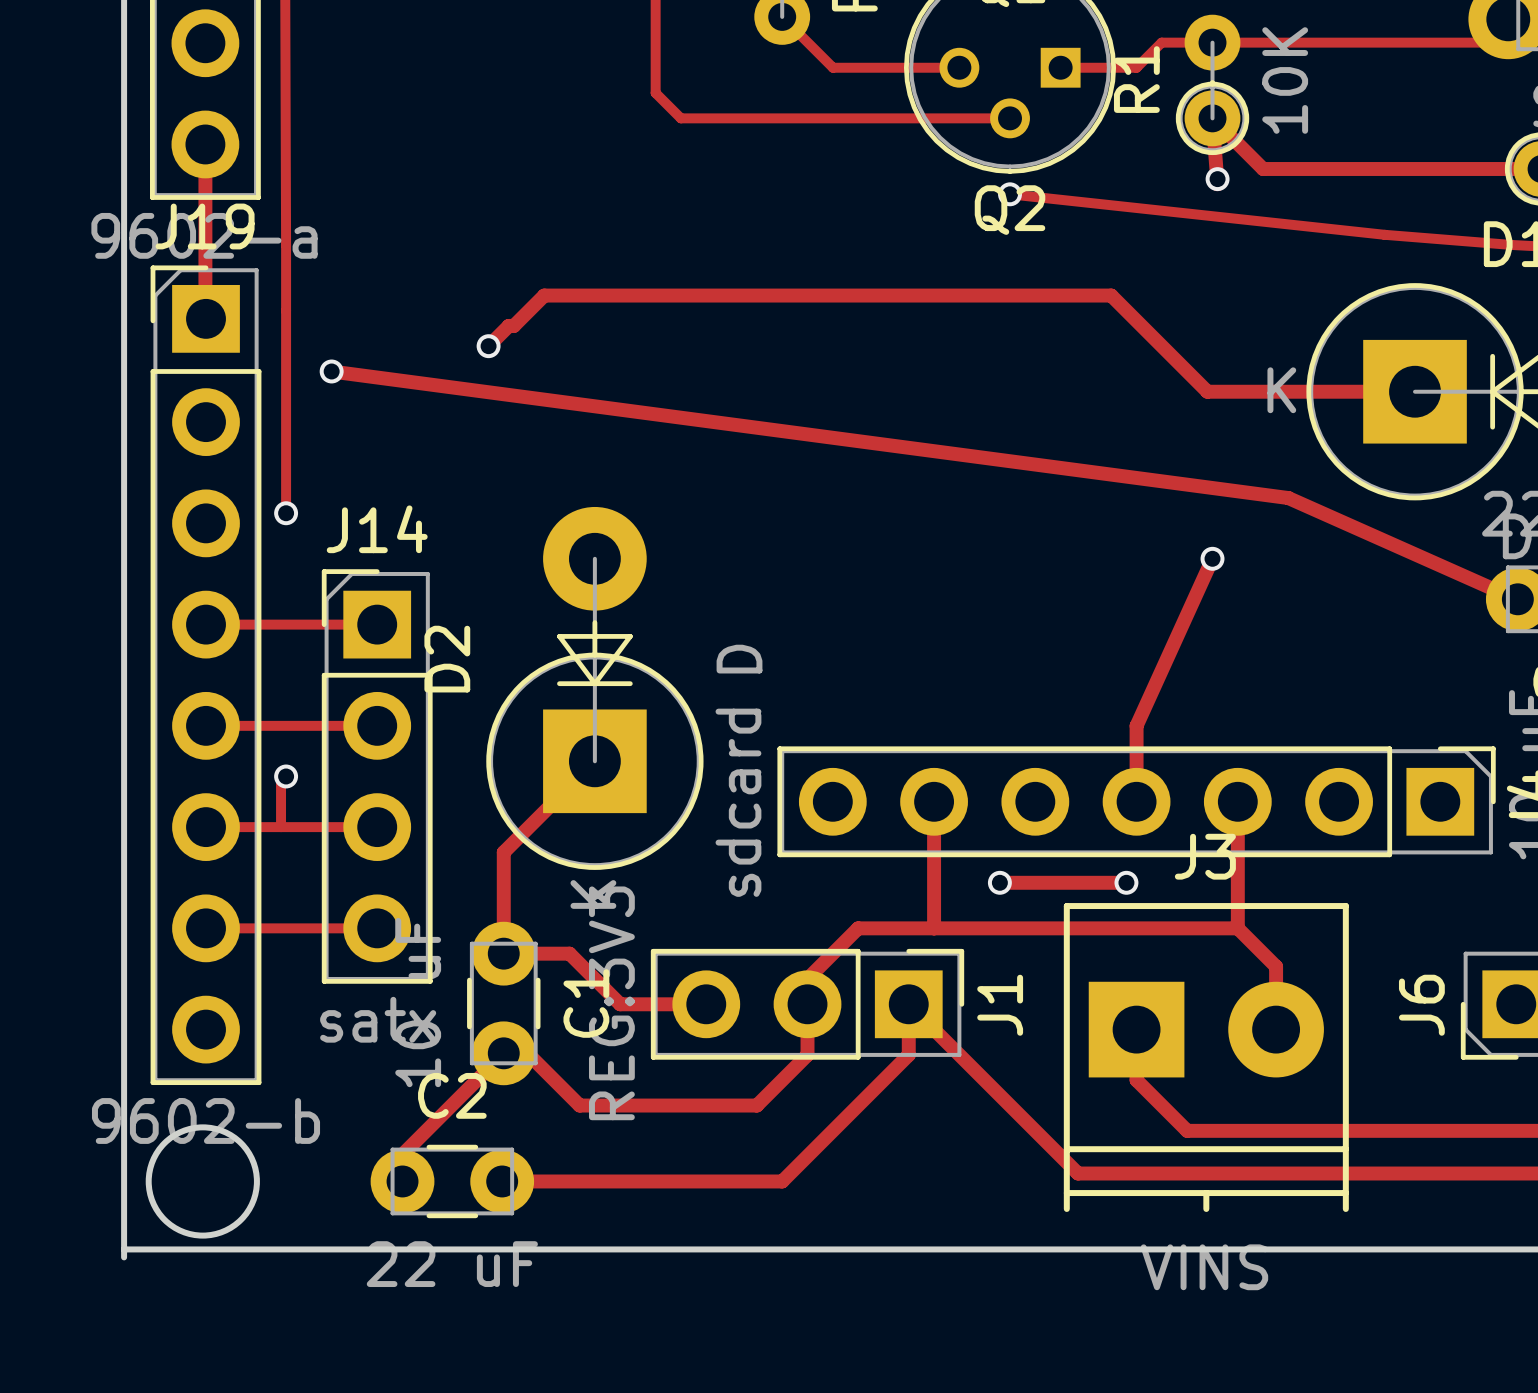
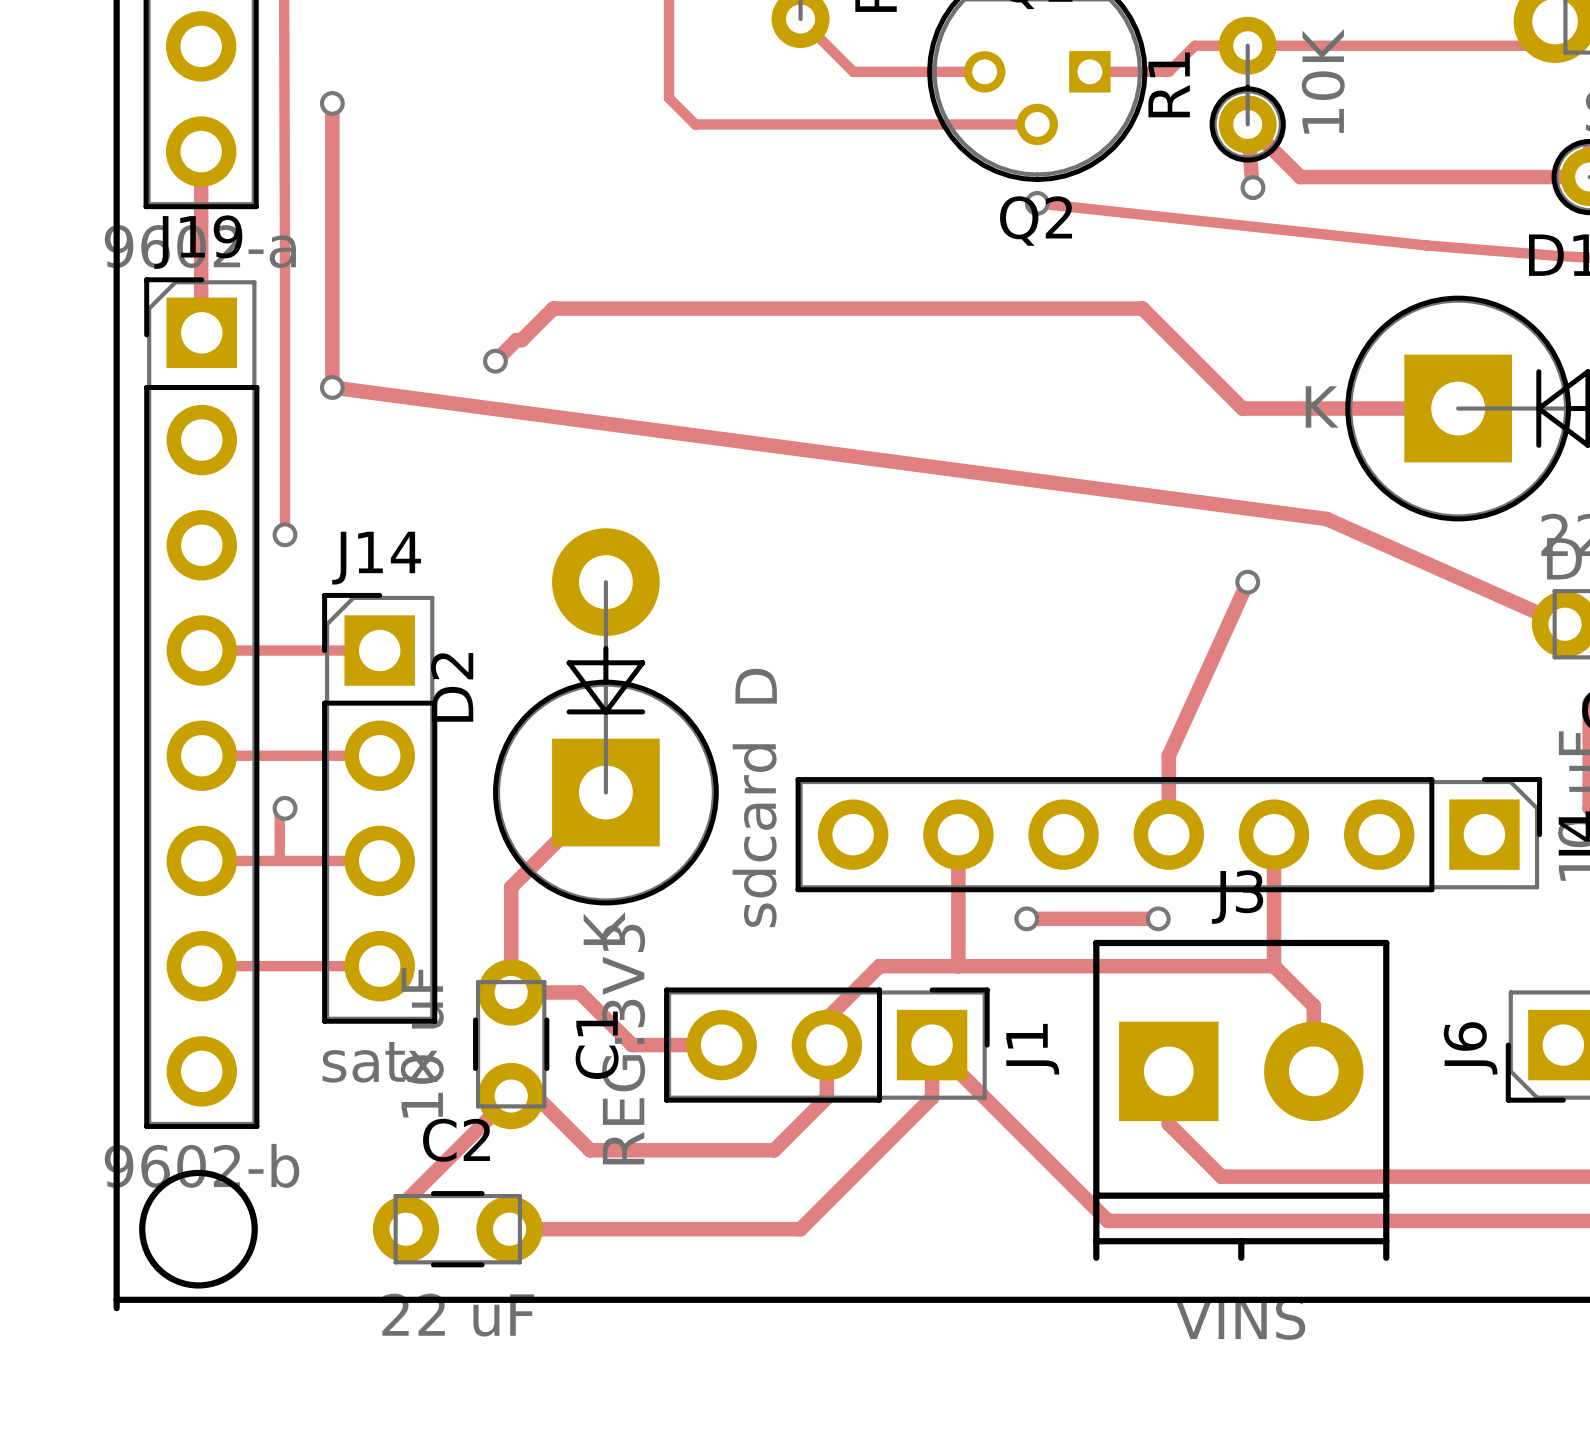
track: none -> (332, 103) (332, 387)
via: none -> (332, 103)

